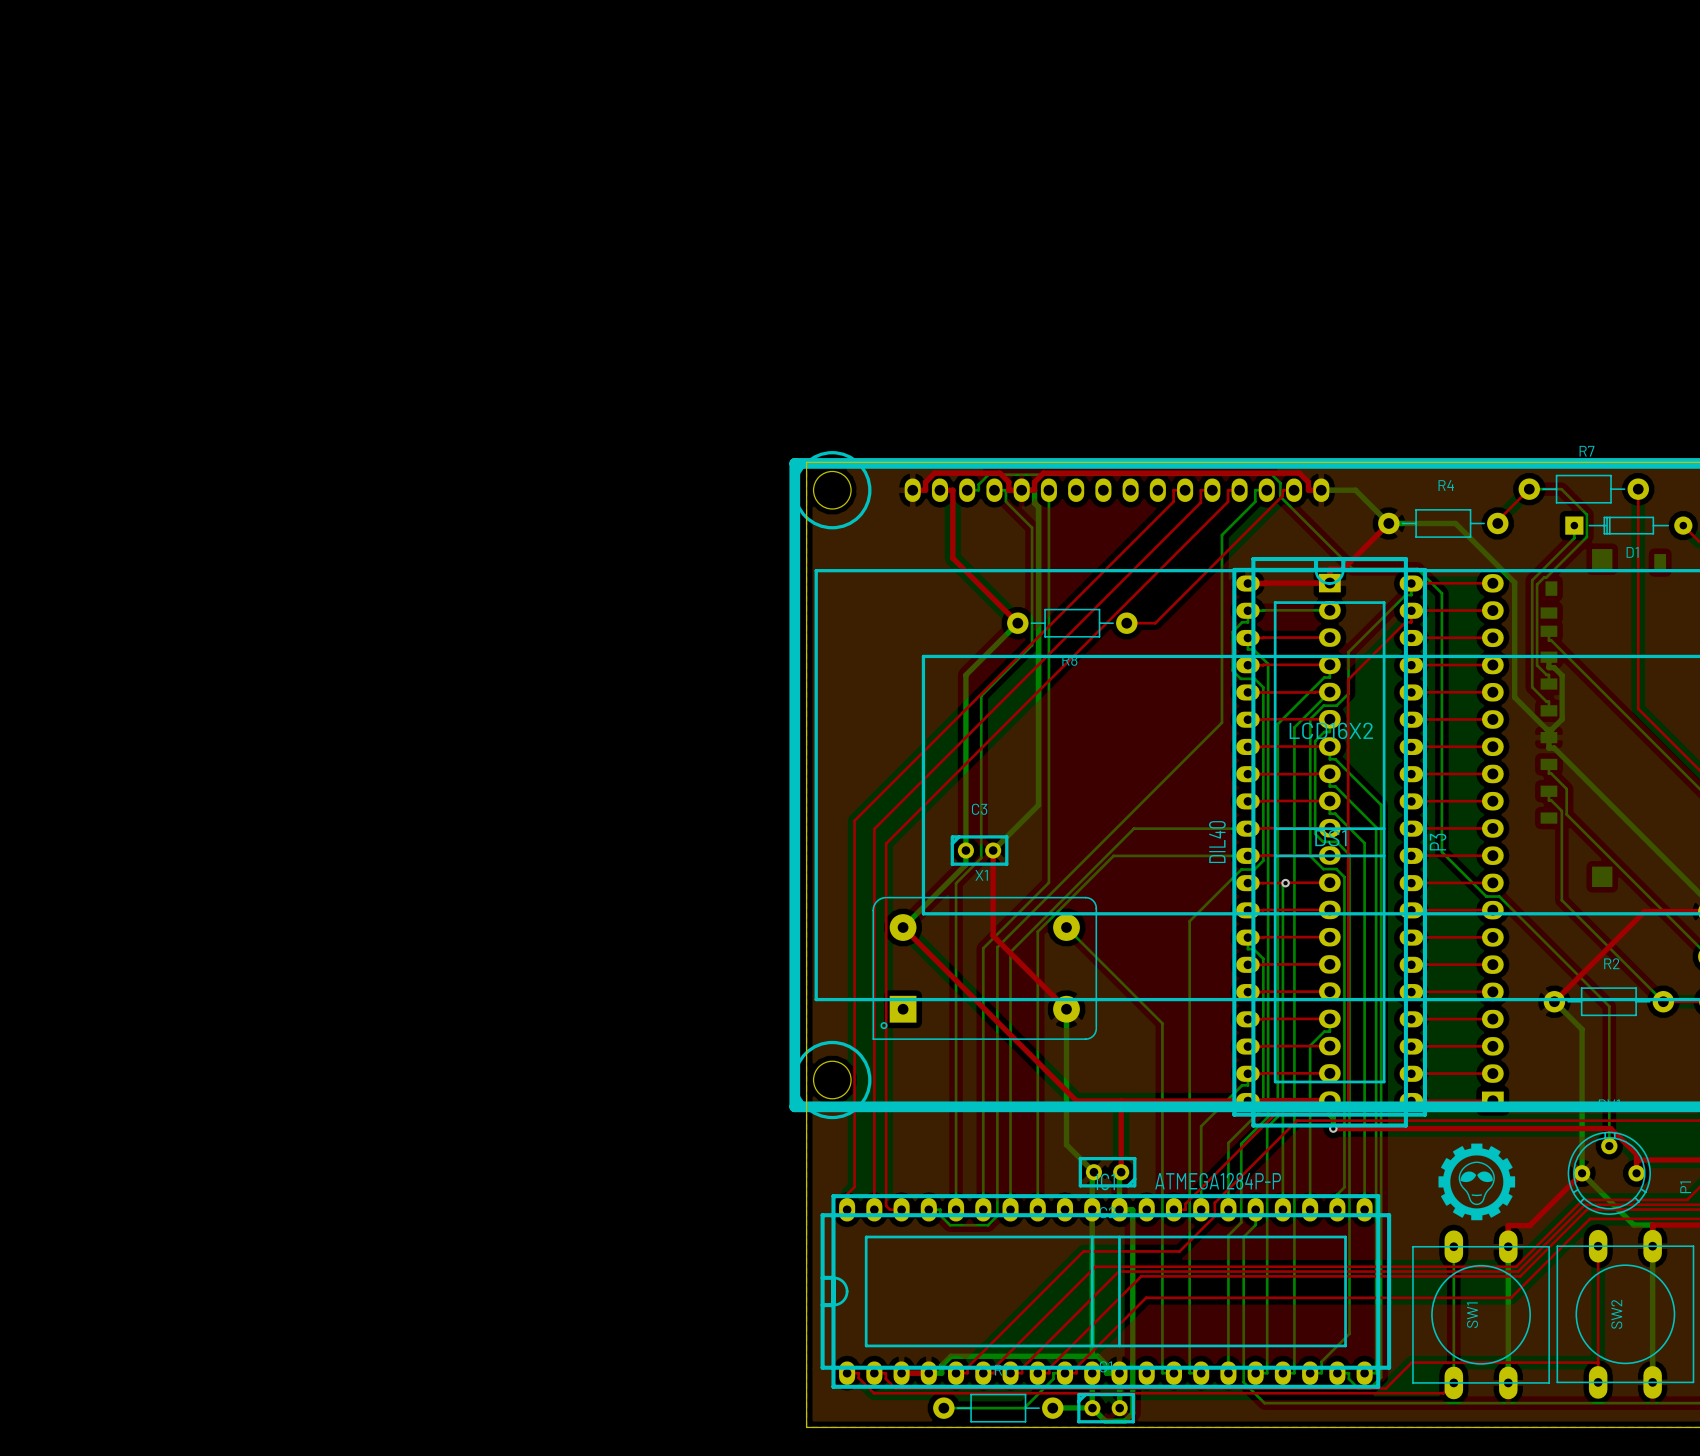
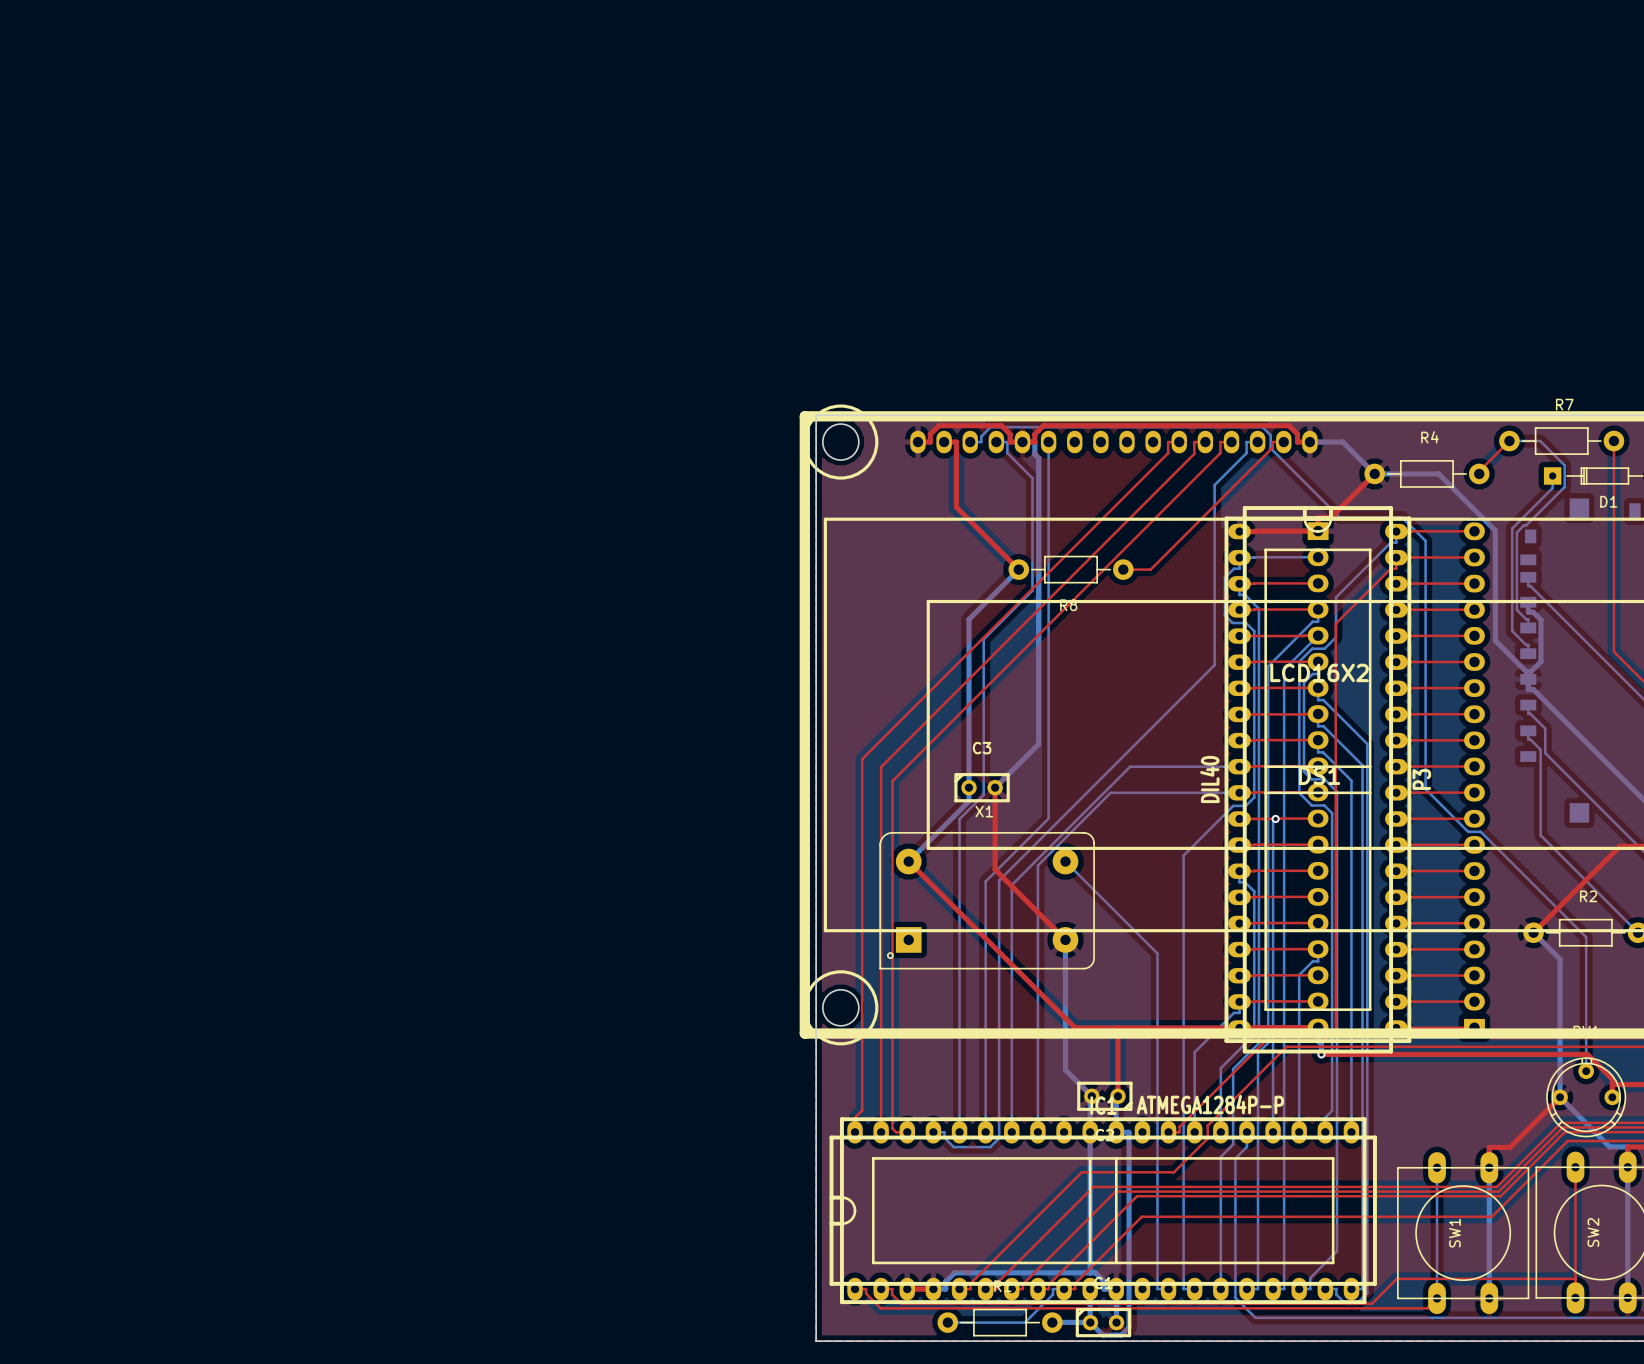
drawing: [1438, 1143, 1516, 1221] -> none

